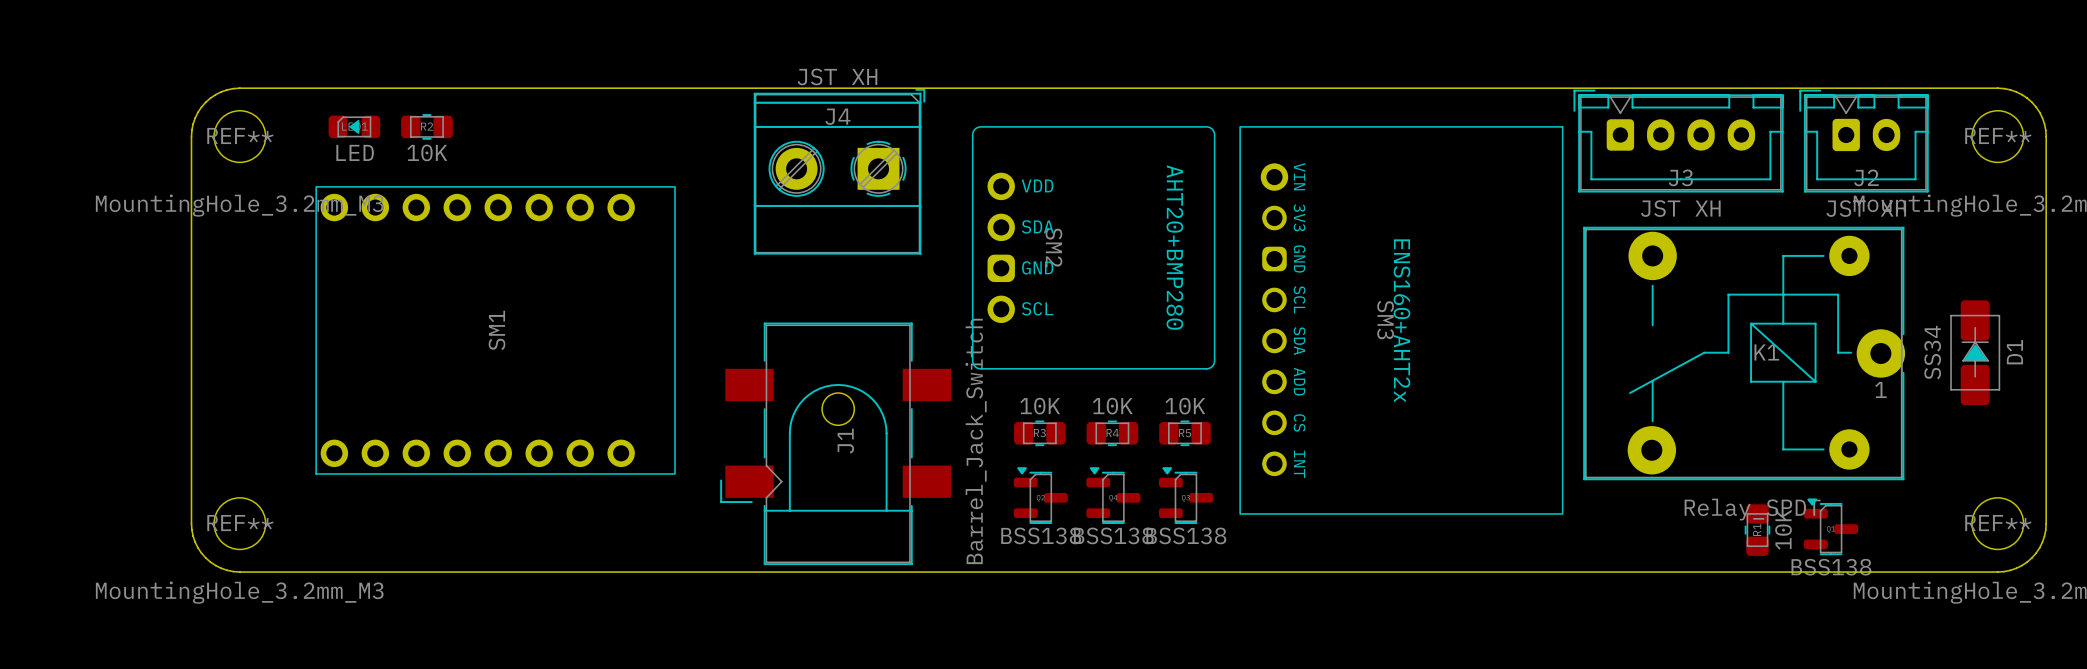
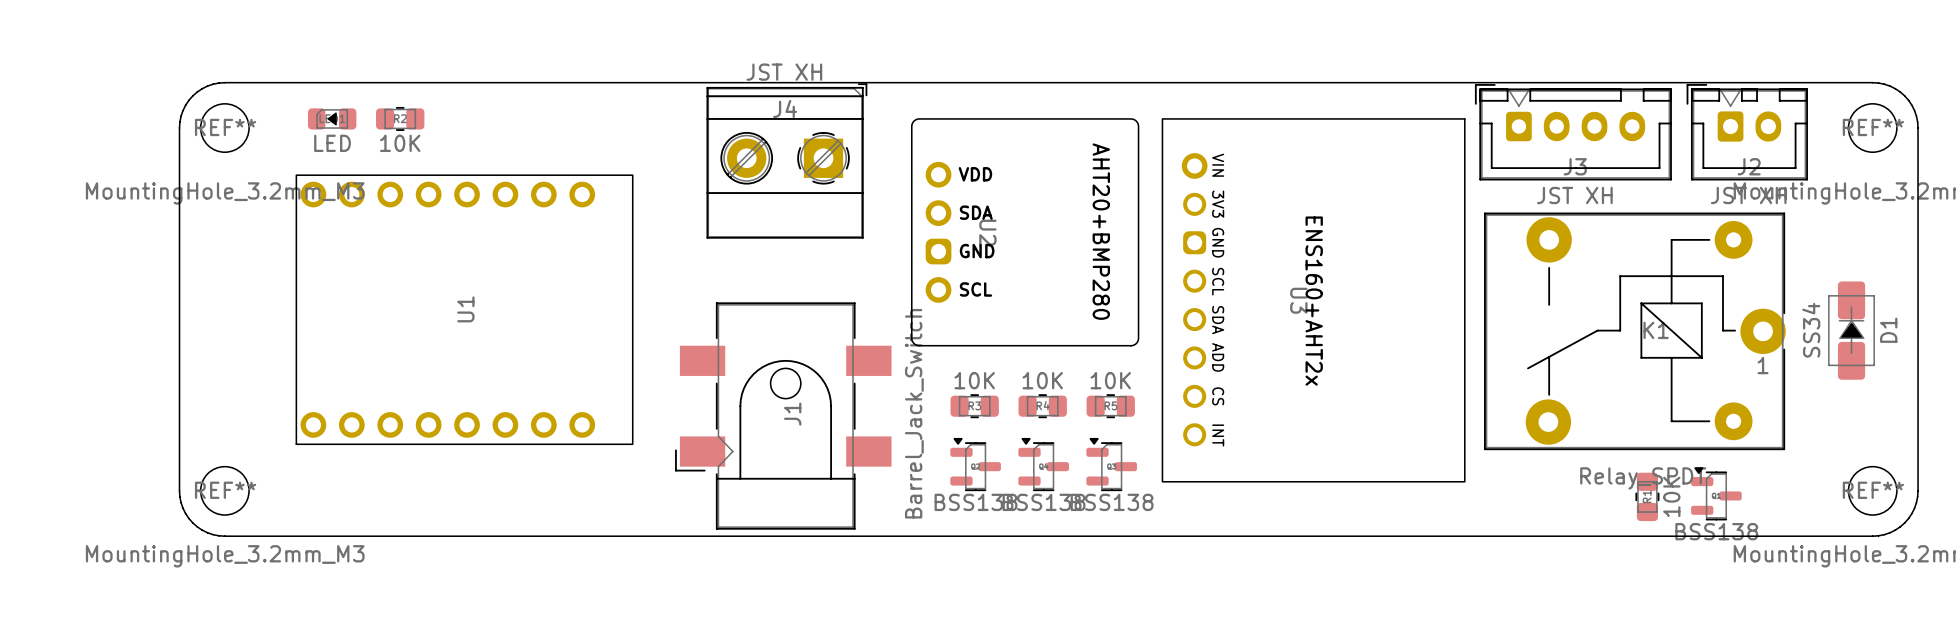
SM2 name: SM2 (1053, 247) -> U2 (987, 232)
SM3 name: SM3 (1385, 320) -> U3 (1298, 300)
SM1 name: SM1 (496, 330) -> U1 (465, 309)

